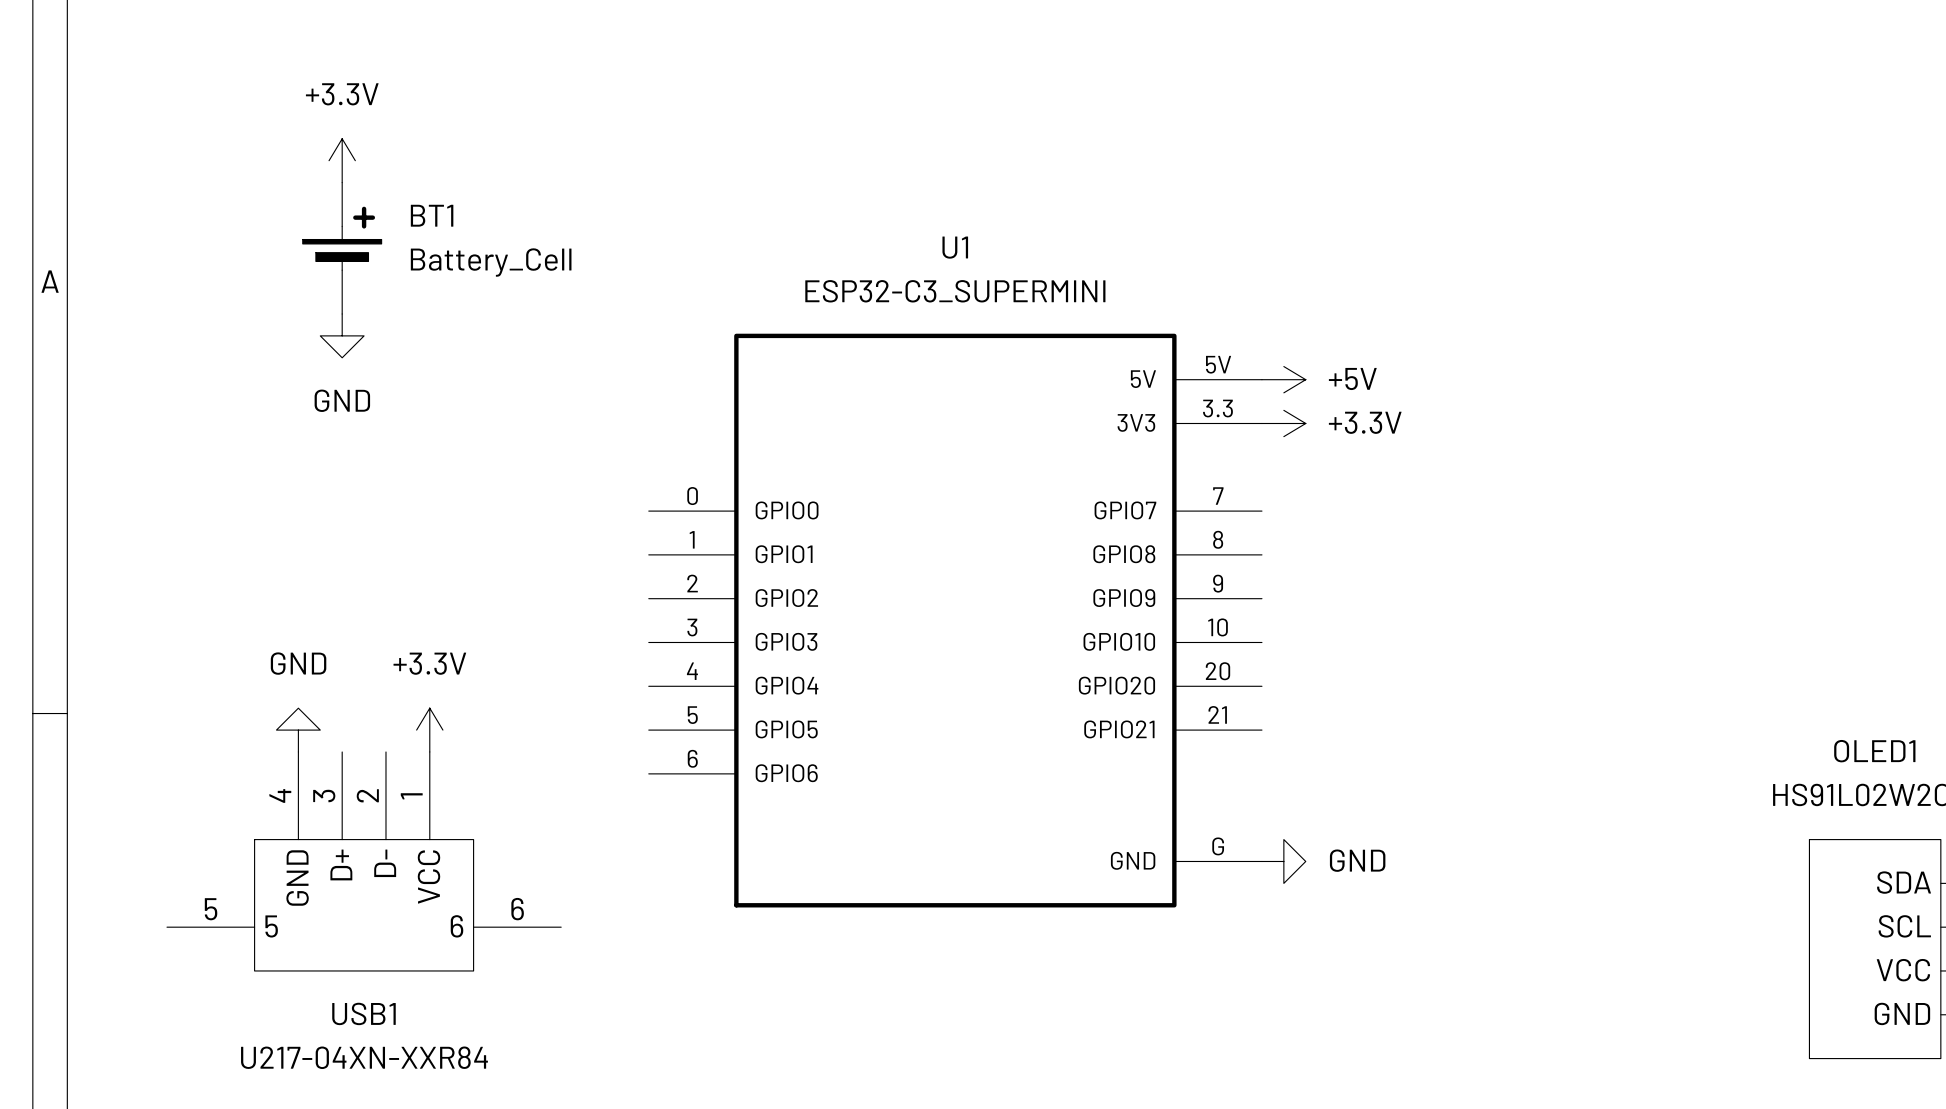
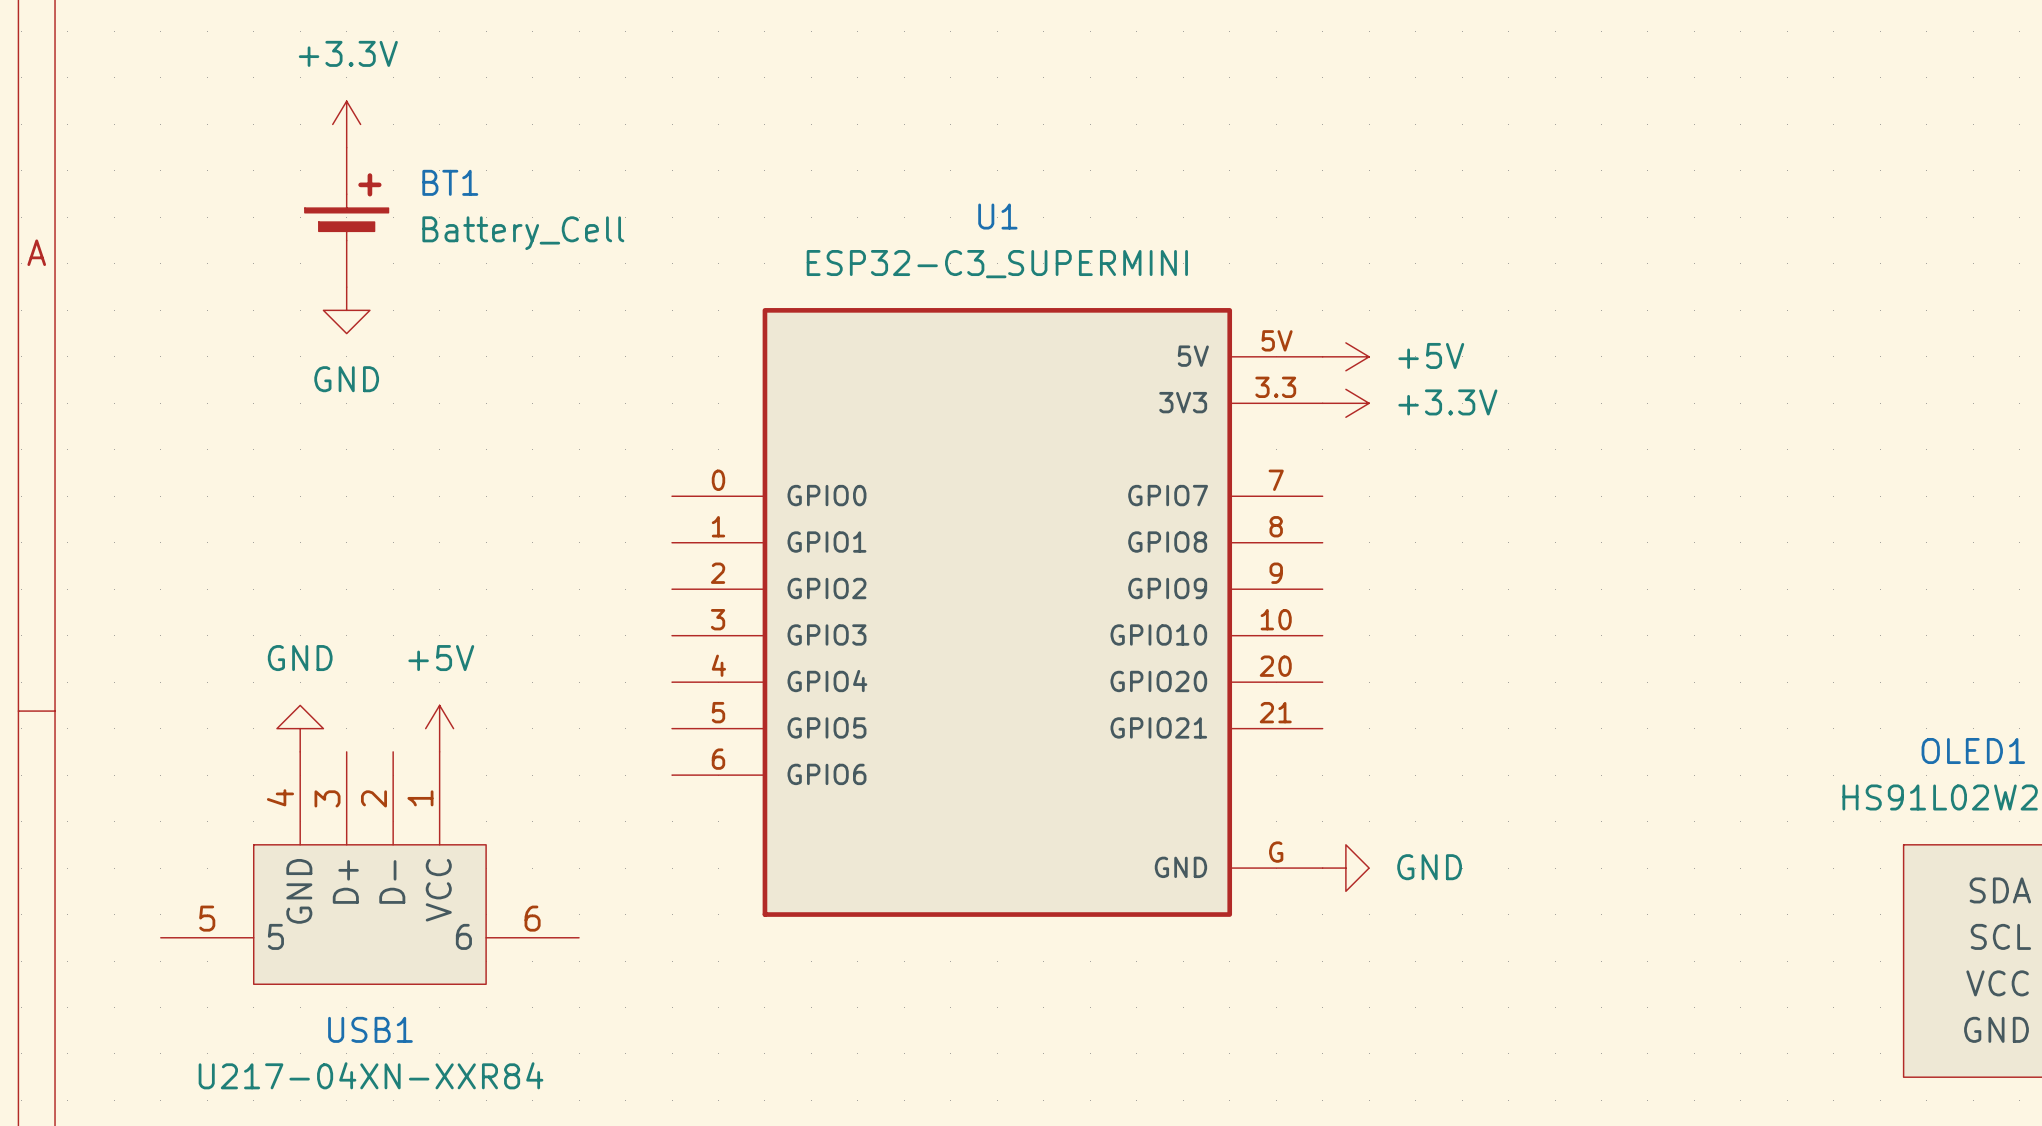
power symbol: +3.3V (429, 730) -> +5V (439, 728)

